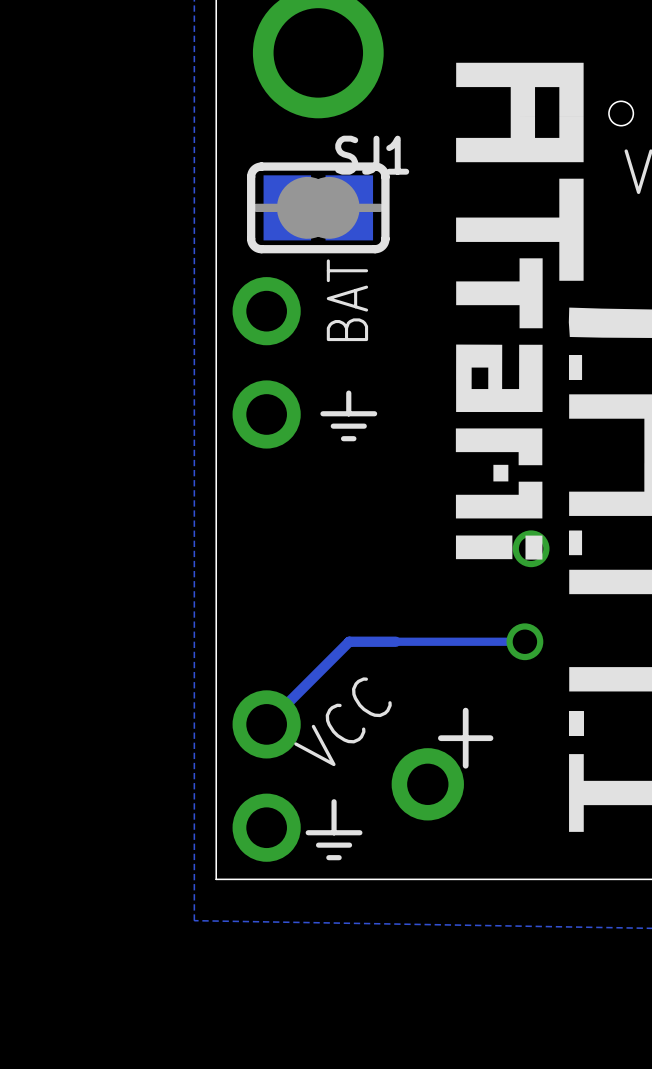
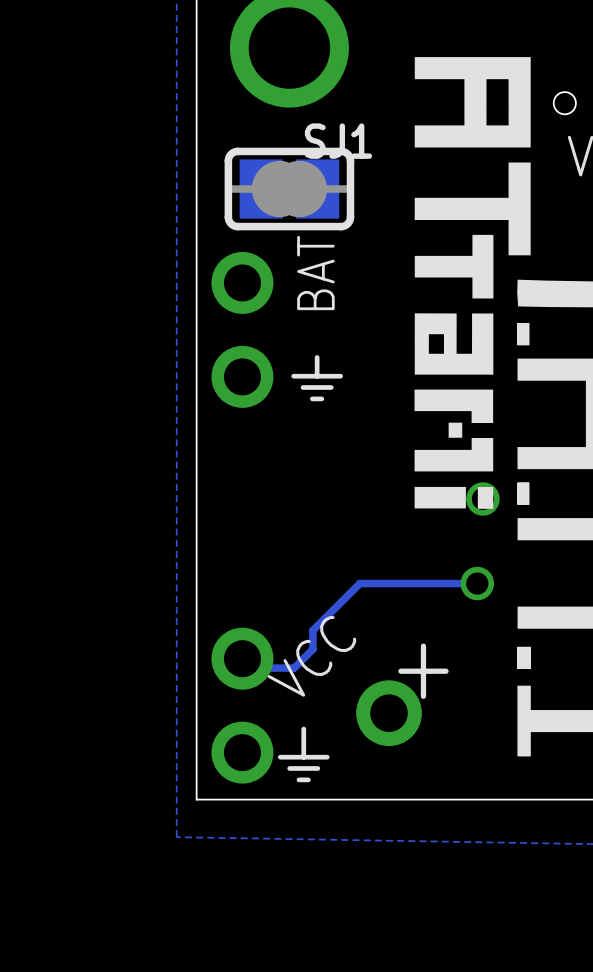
track: (395, 641) (349, 641) (266, 724) -> (359, 583) (312, 630) (312, 649) (294, 668) (251, 668) (242, 658)

